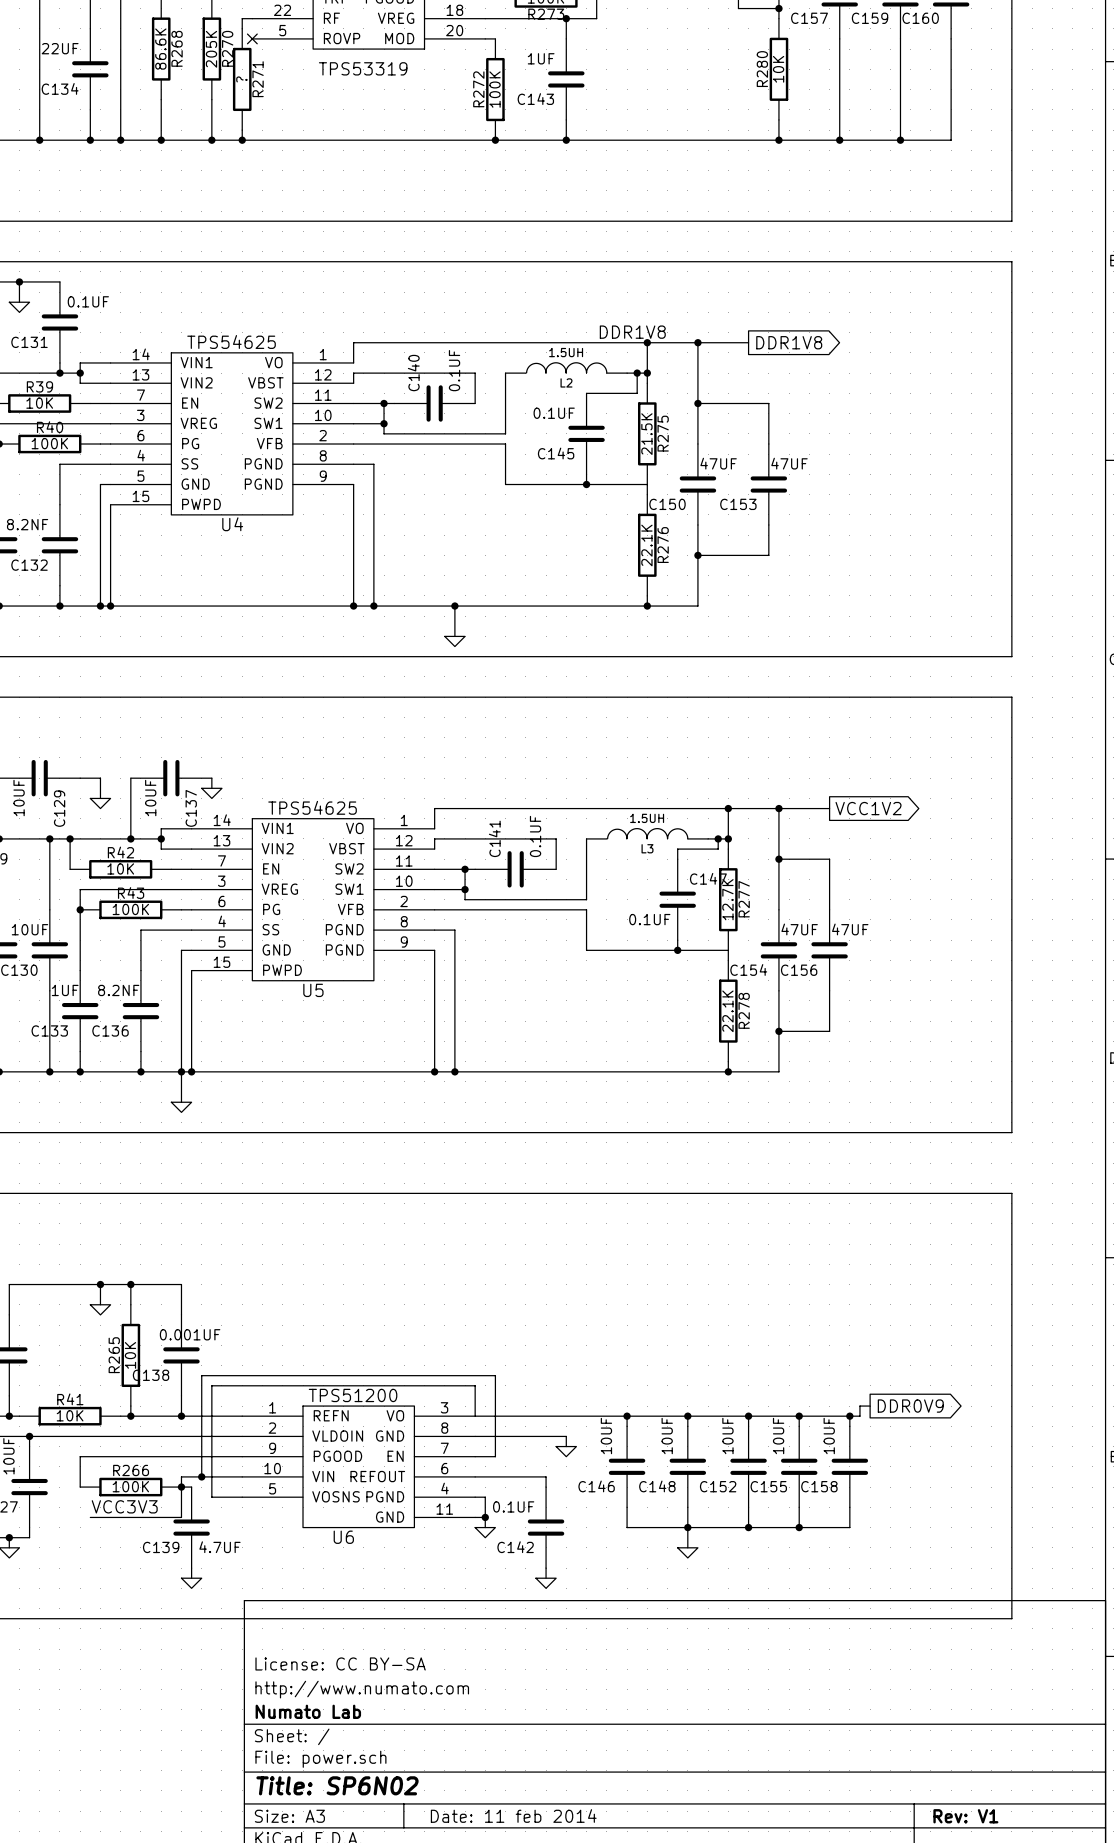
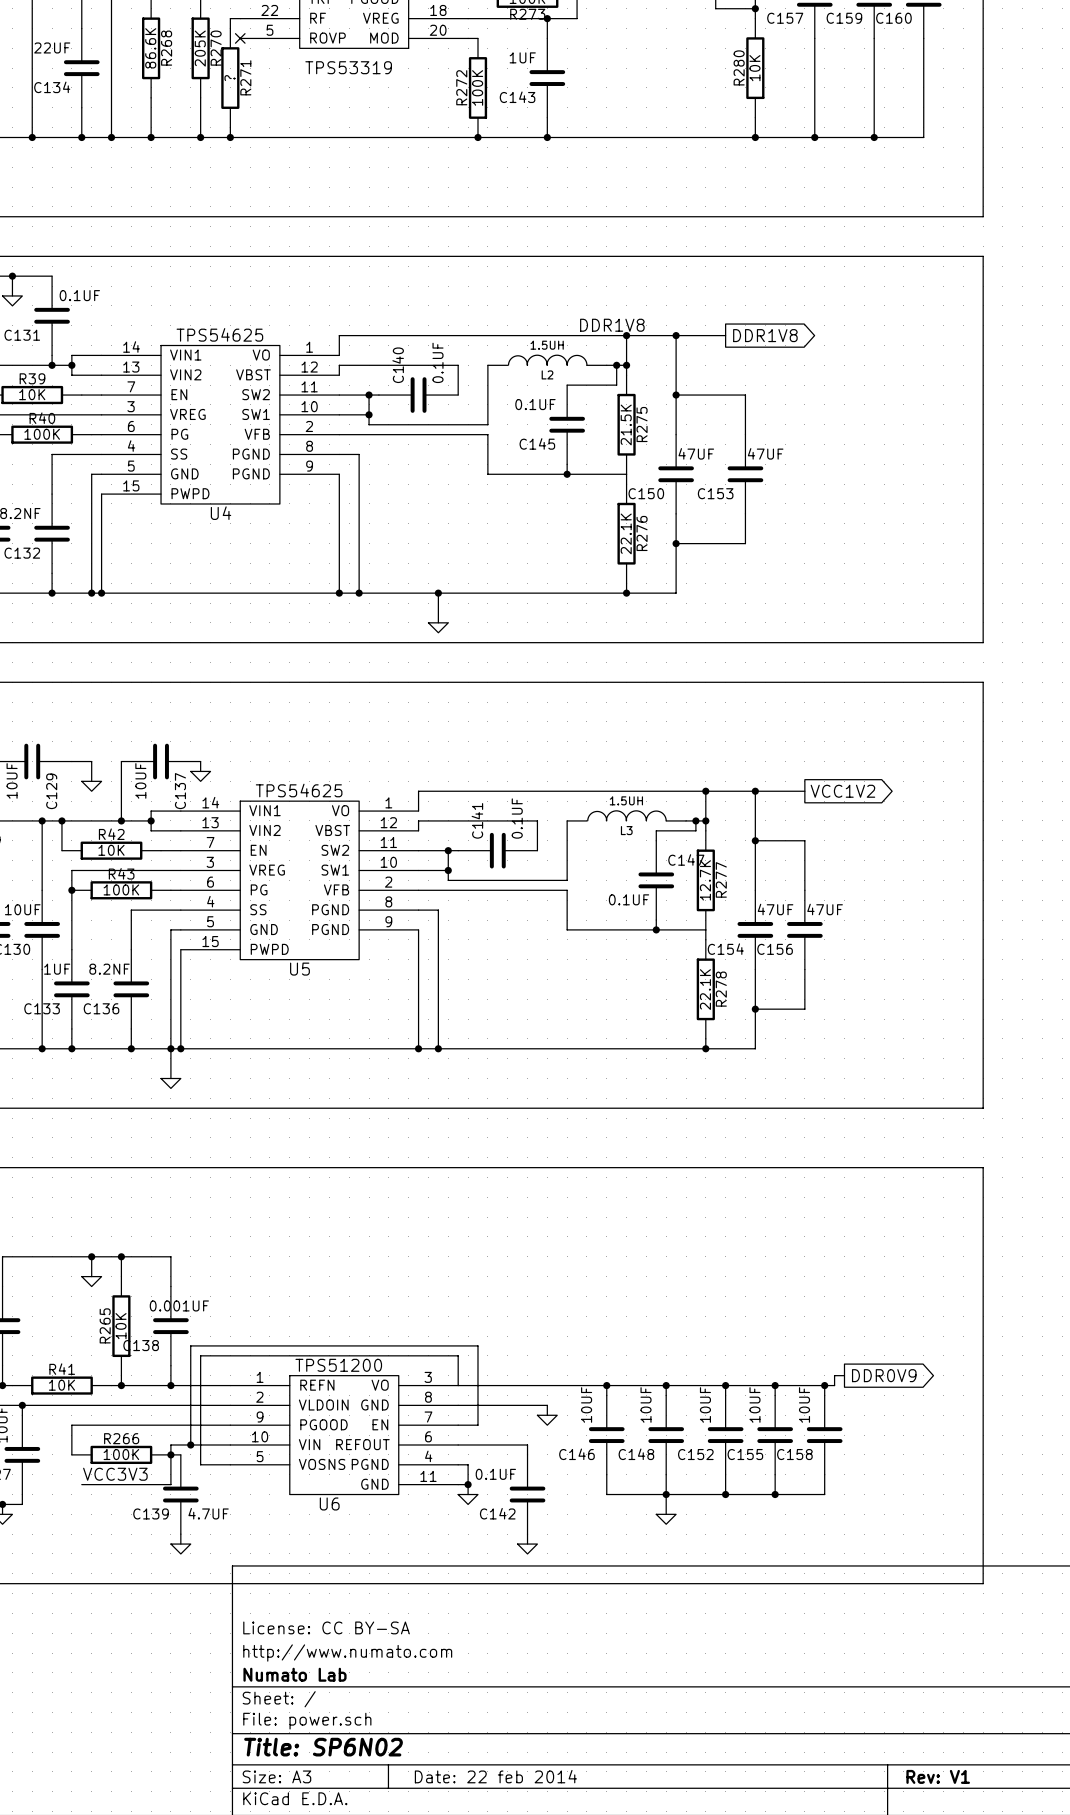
title block: Date: 11 feb 2014 (513, 1815) -> Date: 22 feb 2014 (495, 1776)

